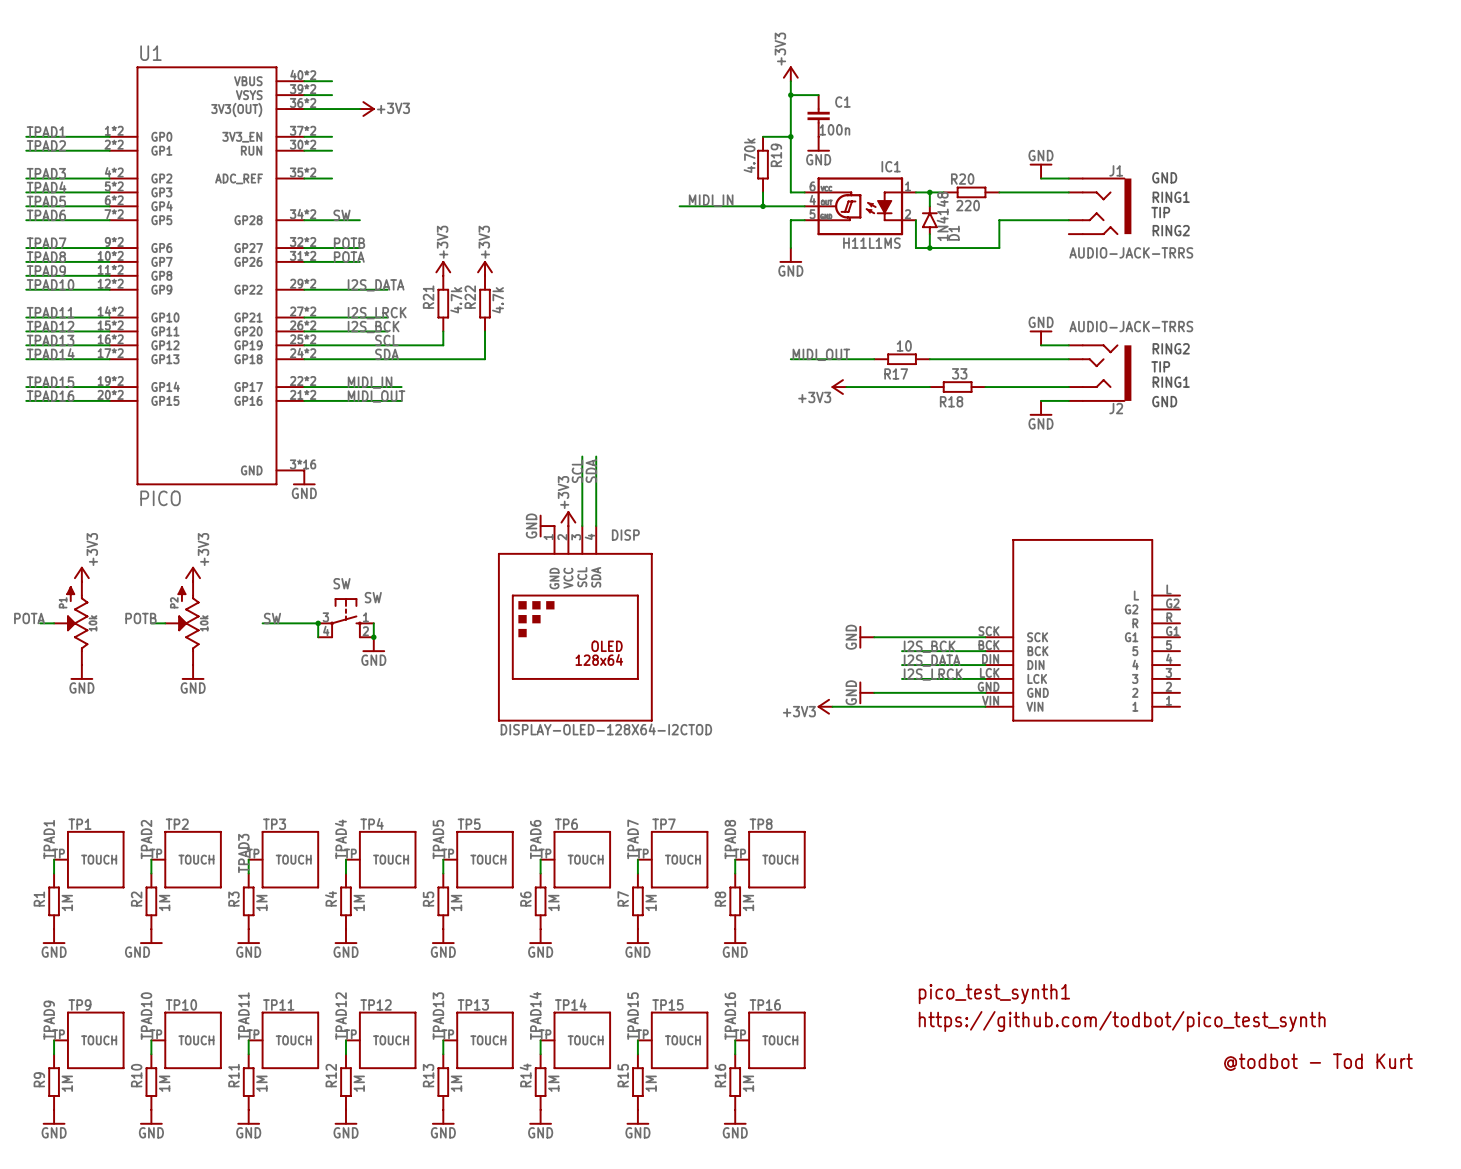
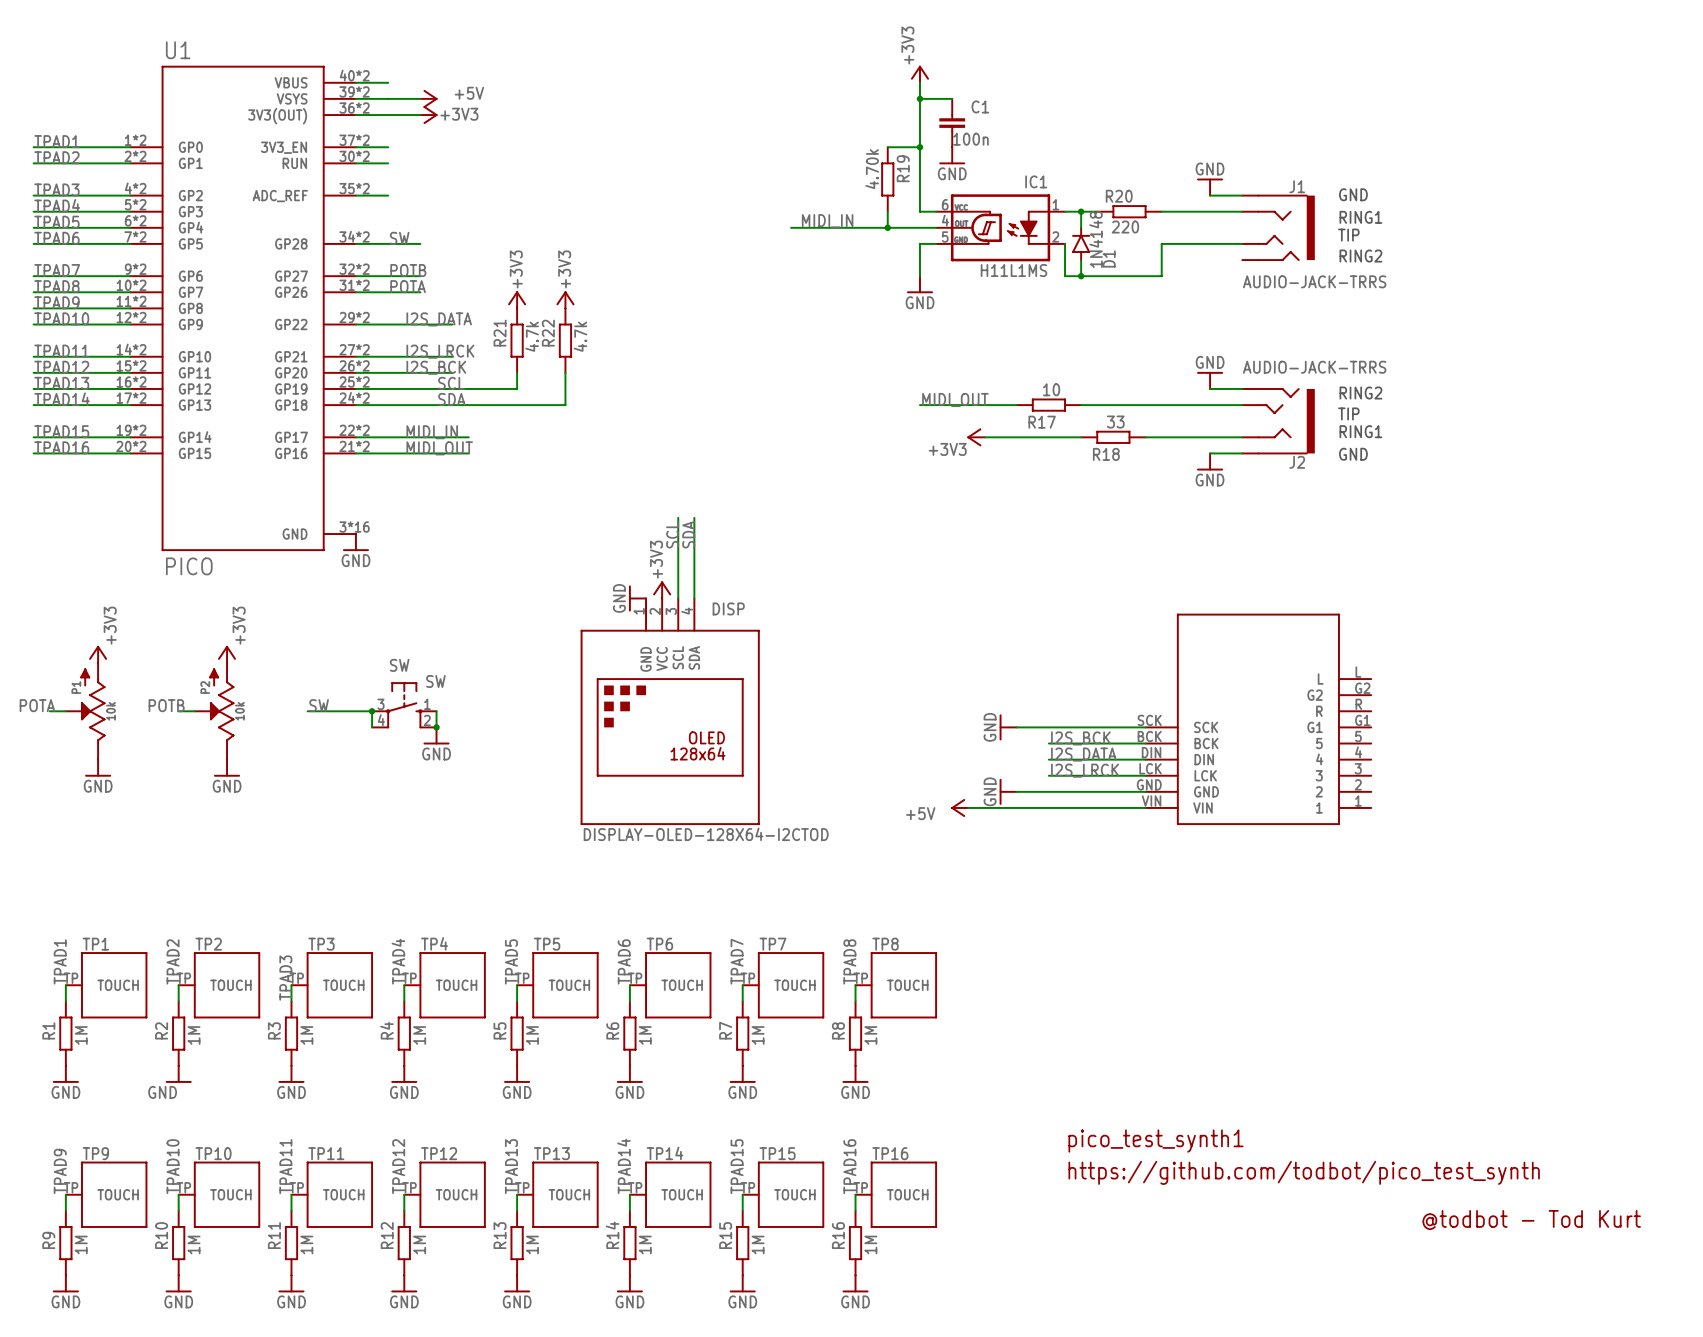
wire: none -> (388, 98) (420, 98)
power symbol: none -> +5V (428, 98)
power symbol: +3V3 (825, 706) -> +5V (959, 807)

